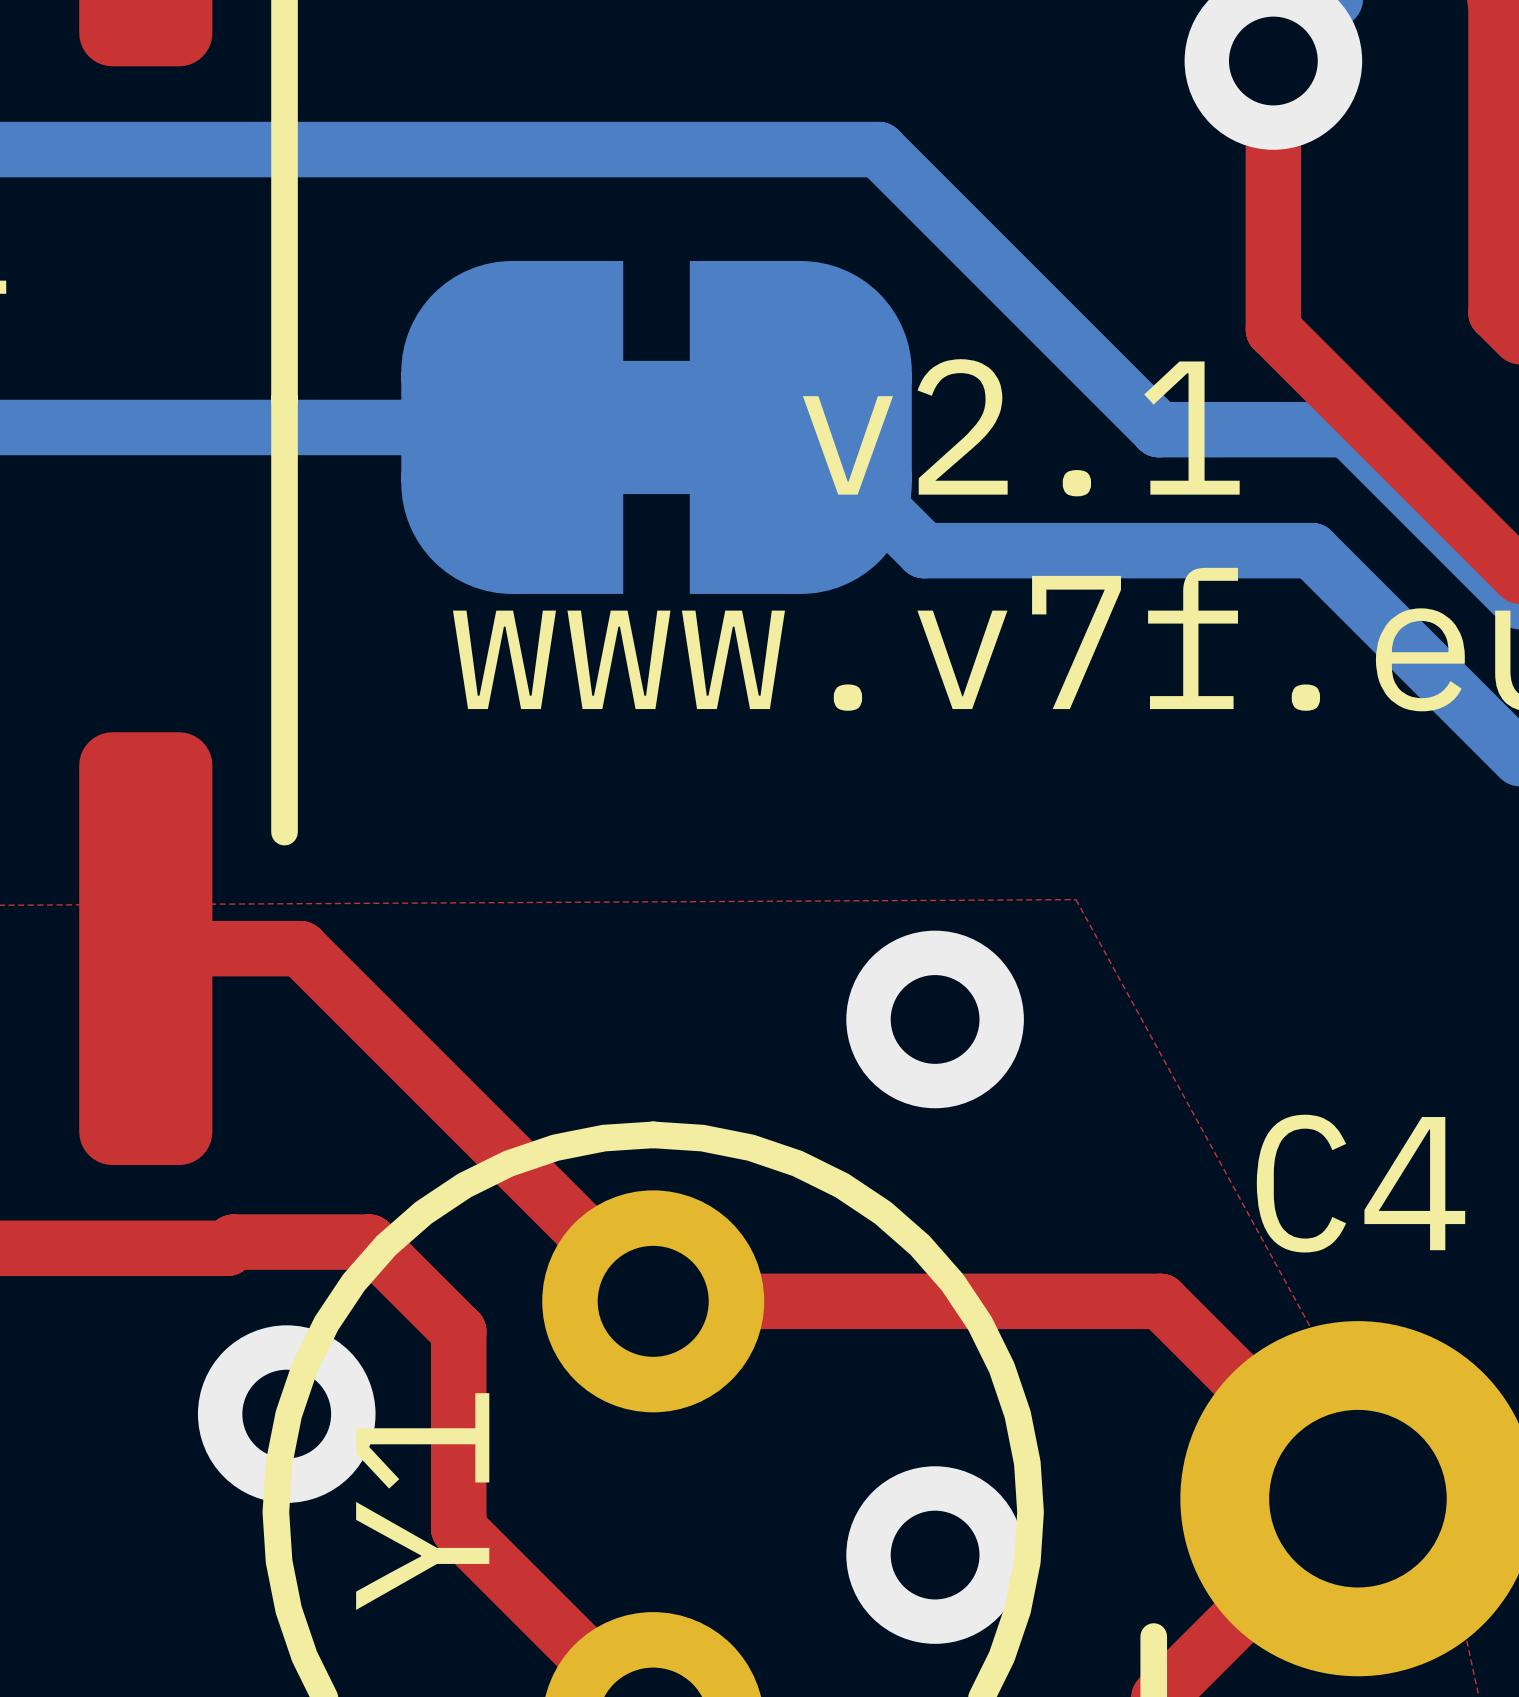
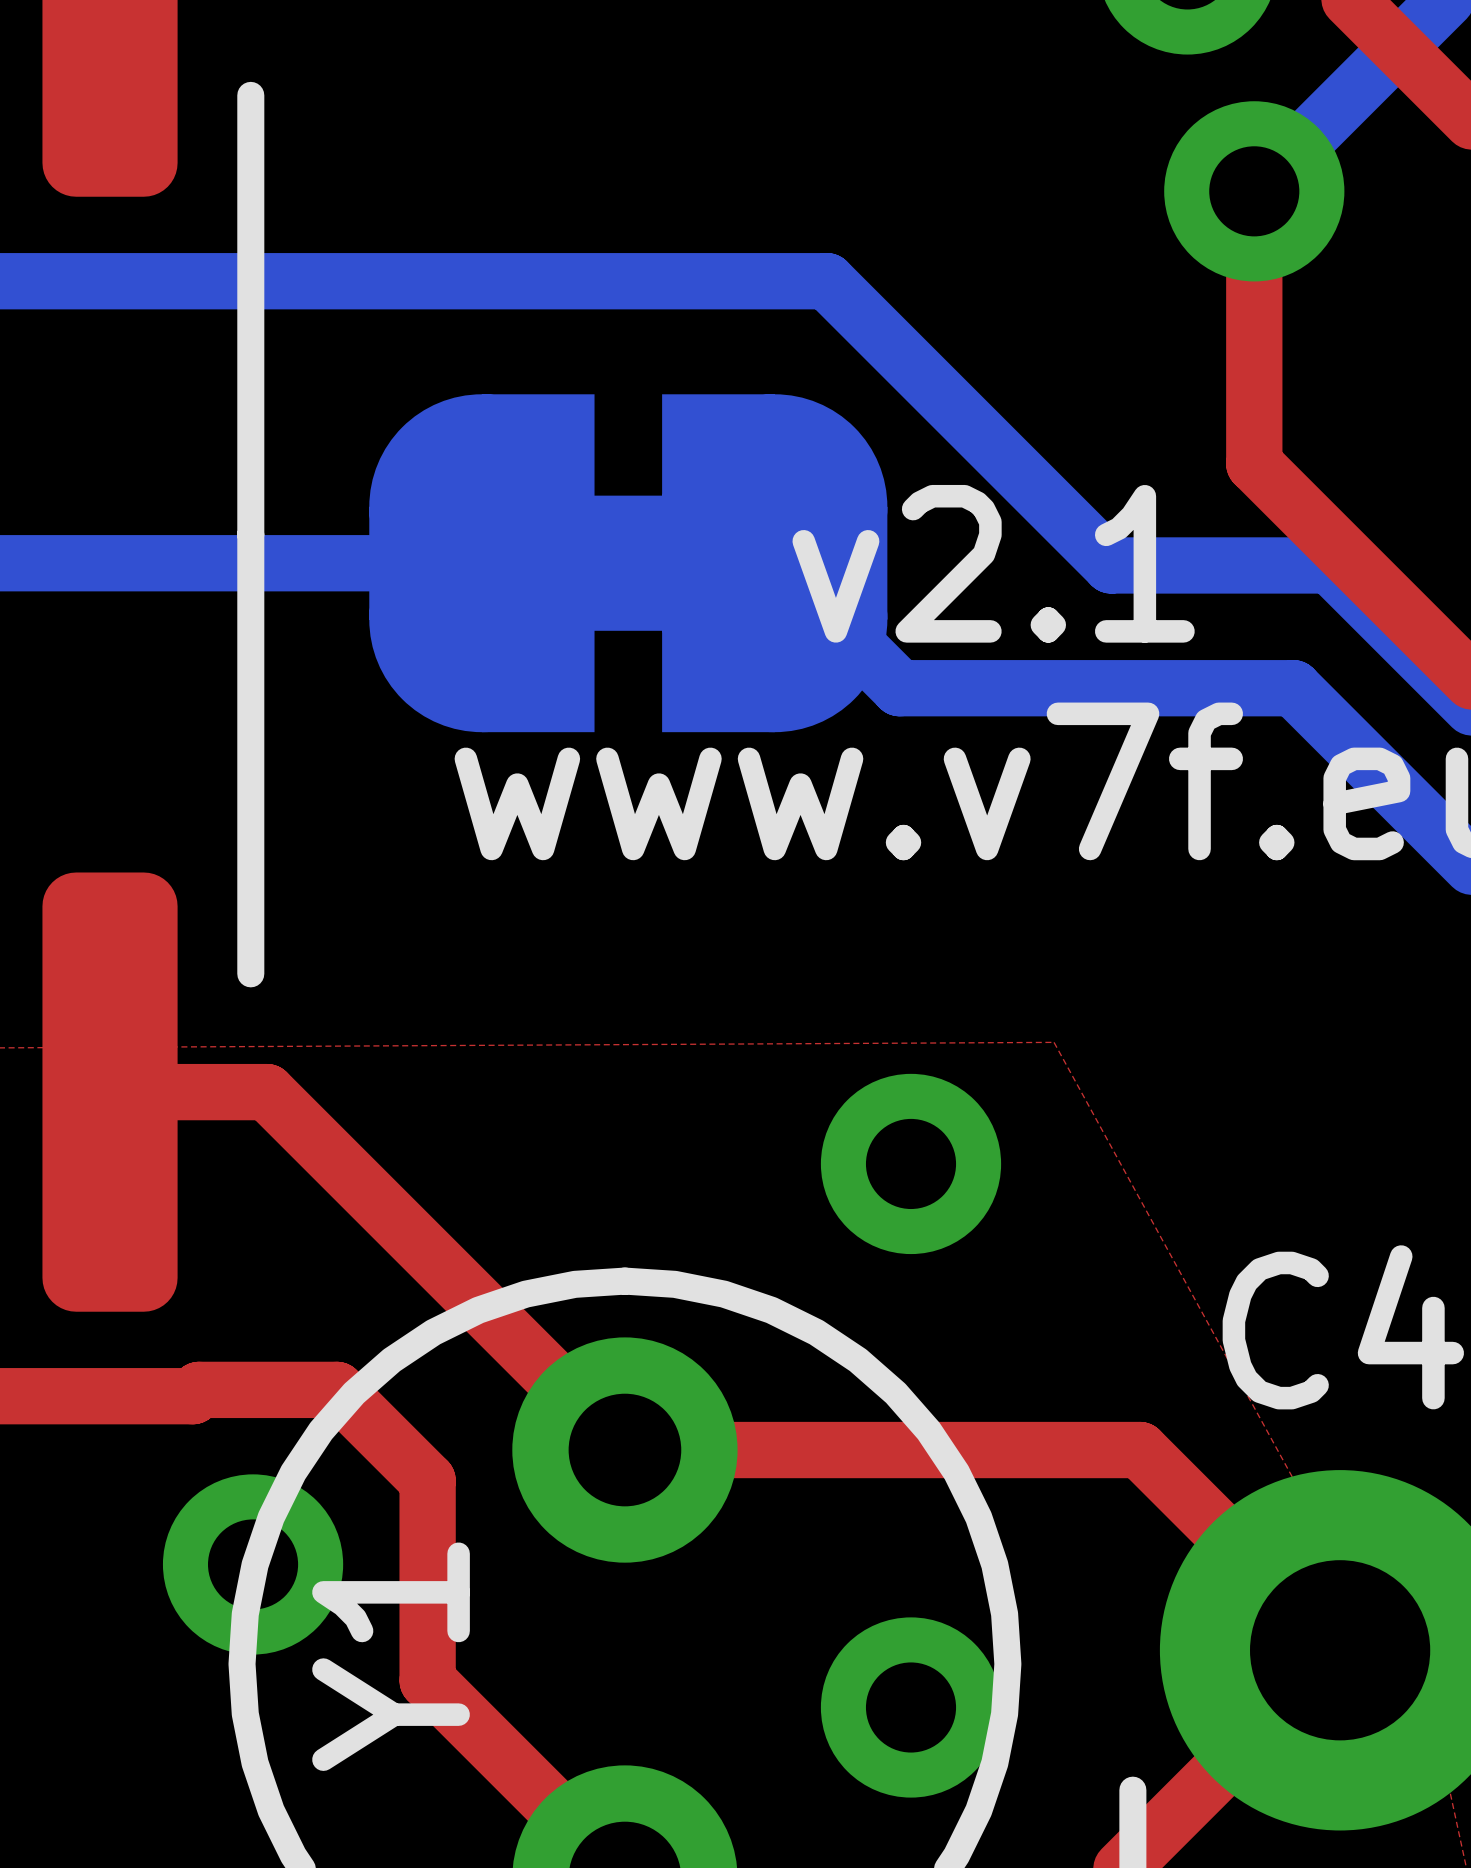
bottom track: (852, 149) (878, 149) (1158, 429) -> (827, 281) (1111, 565) (1138, 565)

